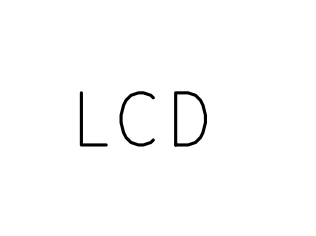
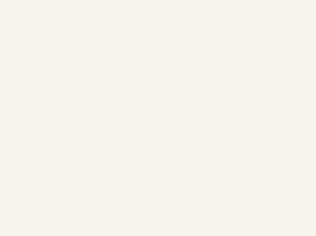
label: LCD (143, 118) -> none

